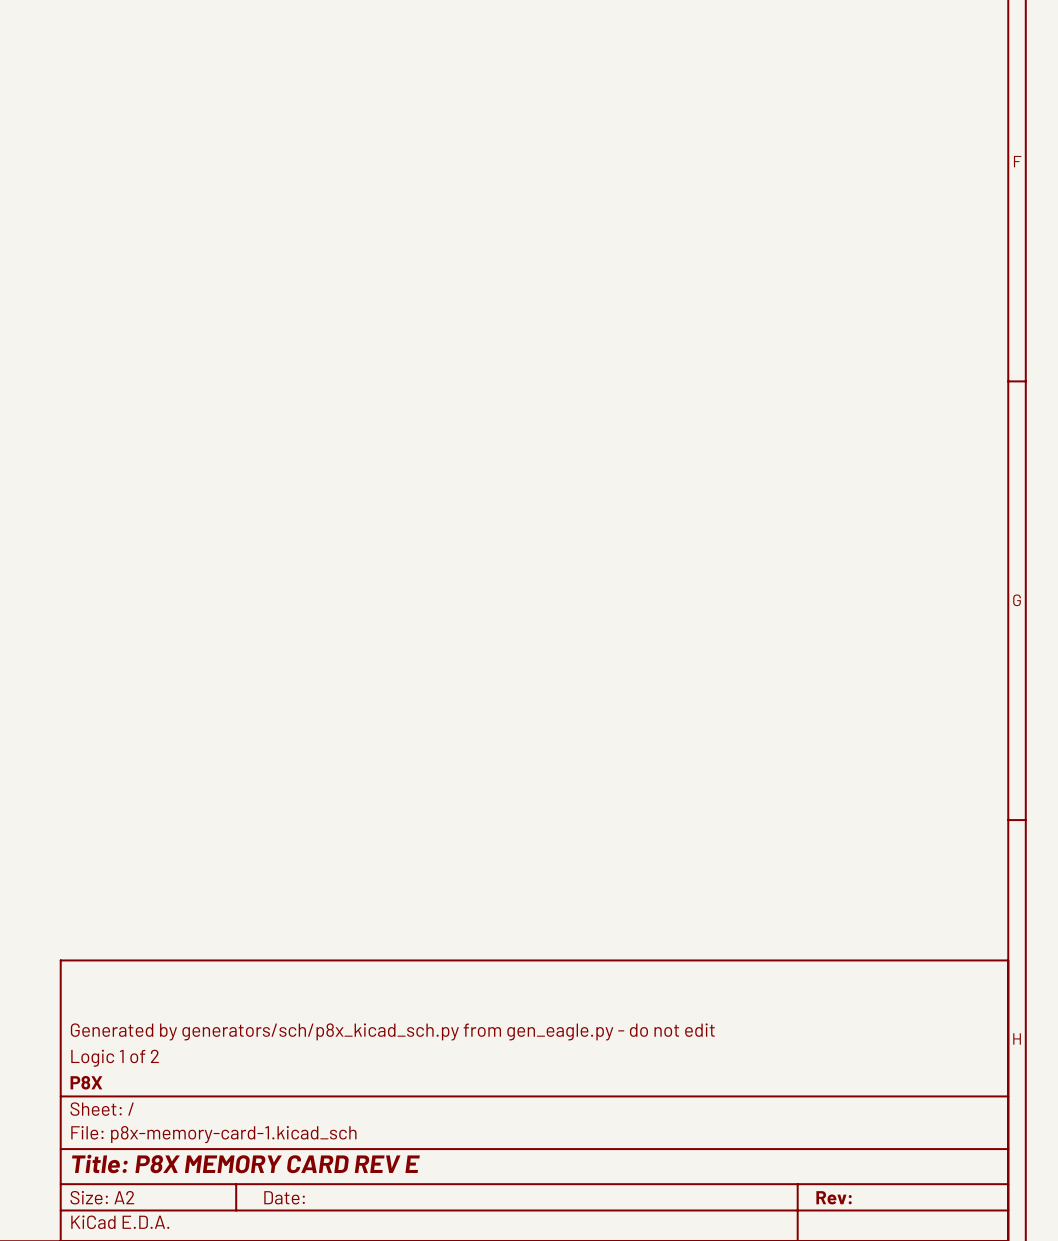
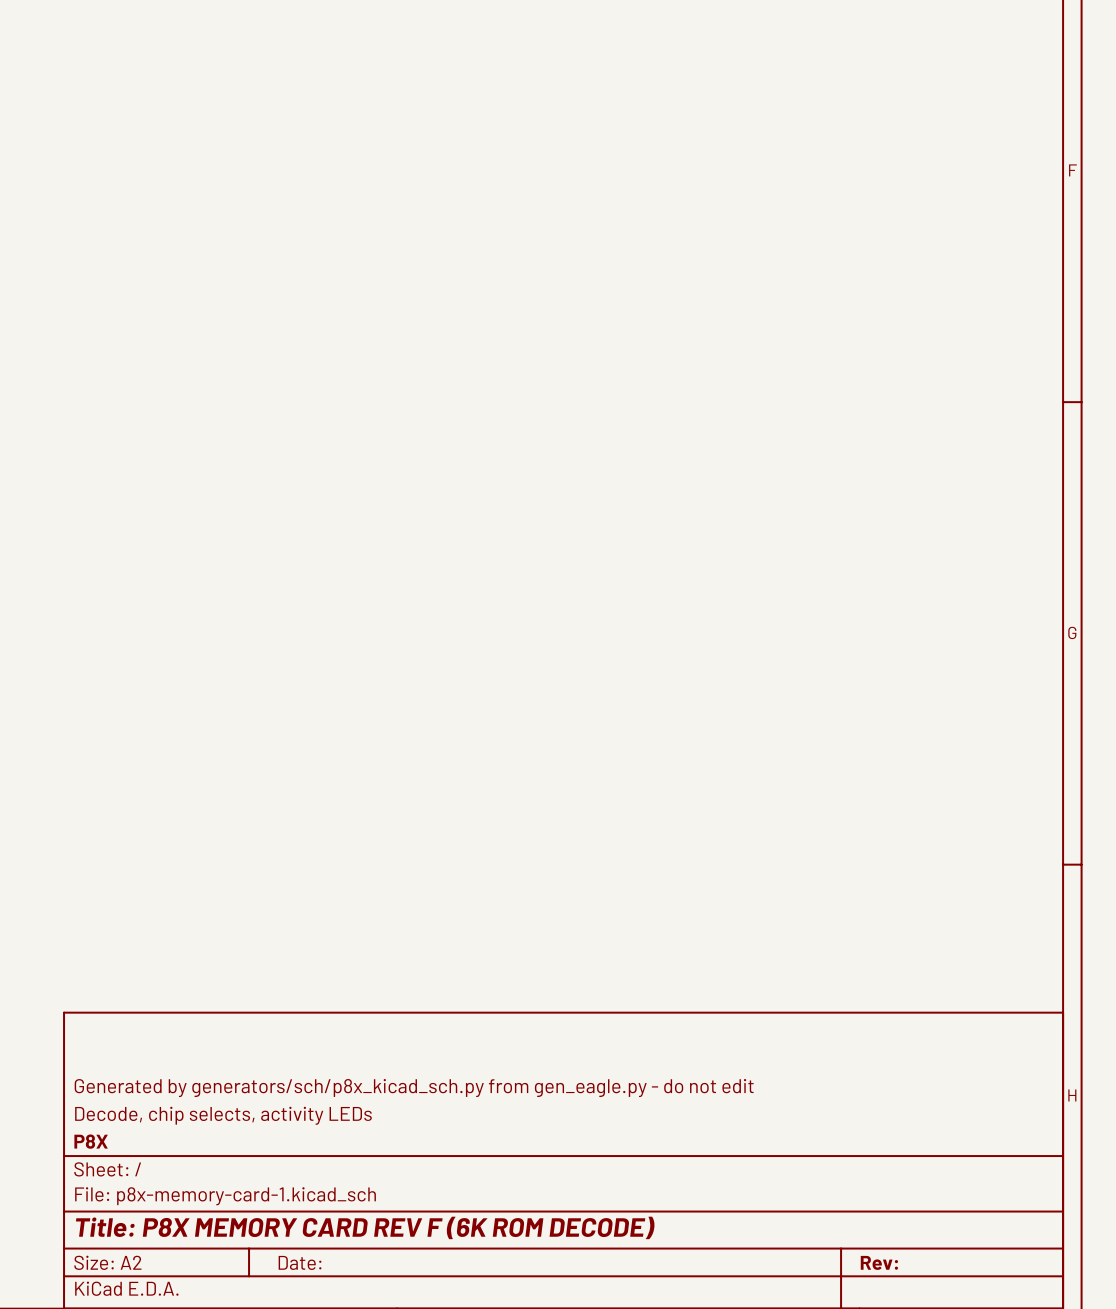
title block: Logic 1 of 2 (115, 1058) -> Decode, chip selects, activity LEDs (223, 1115)
title block: Title: P8X MEMORY CARD REV E (245, 1163) -> Title: P8X MEMORY CARD REV F (6K ROM DECODE) (365, 1227)

